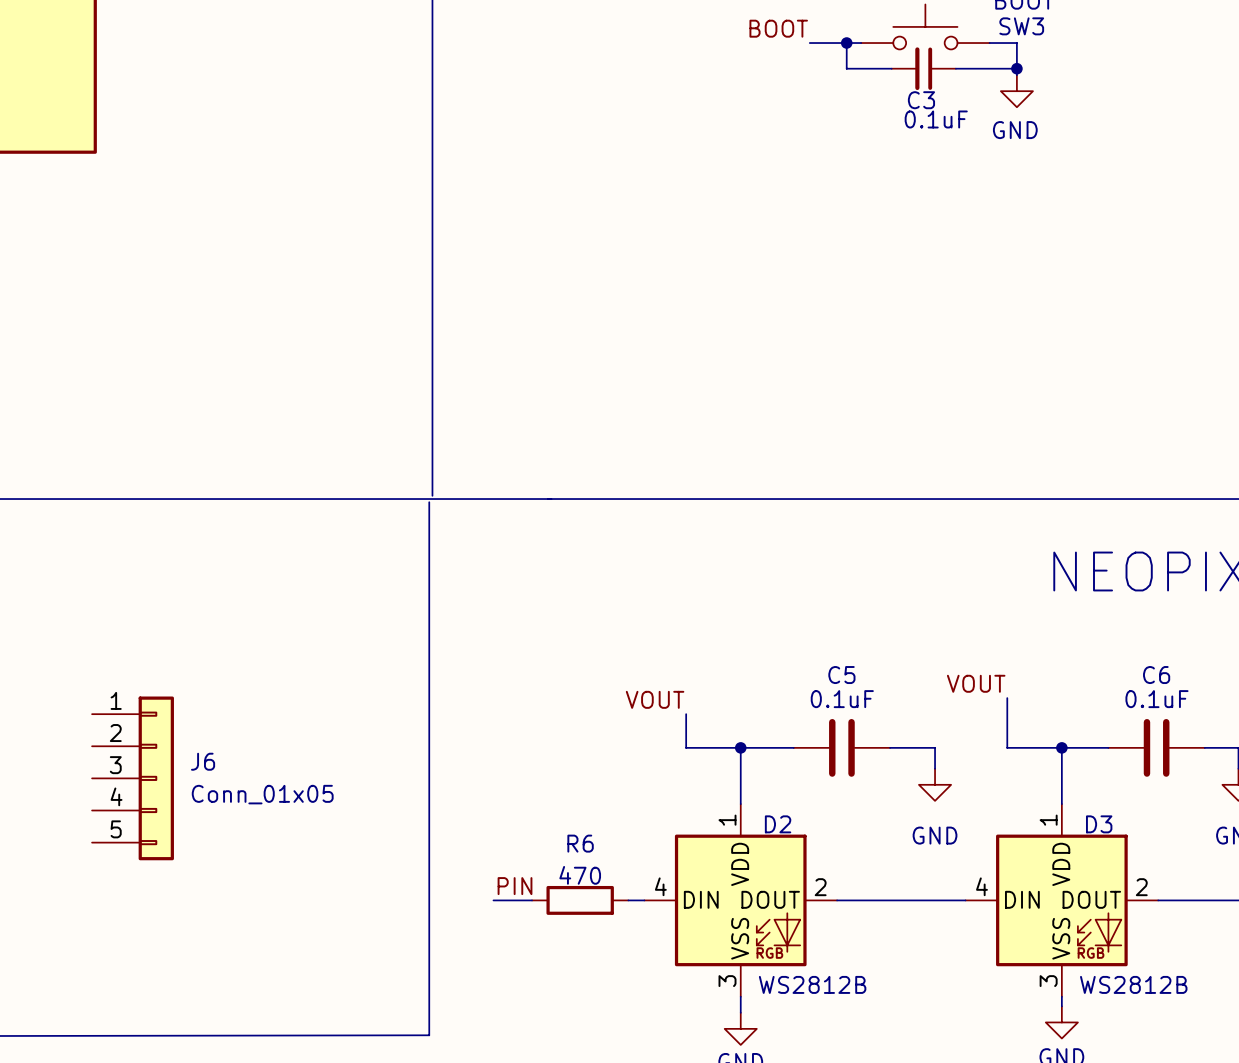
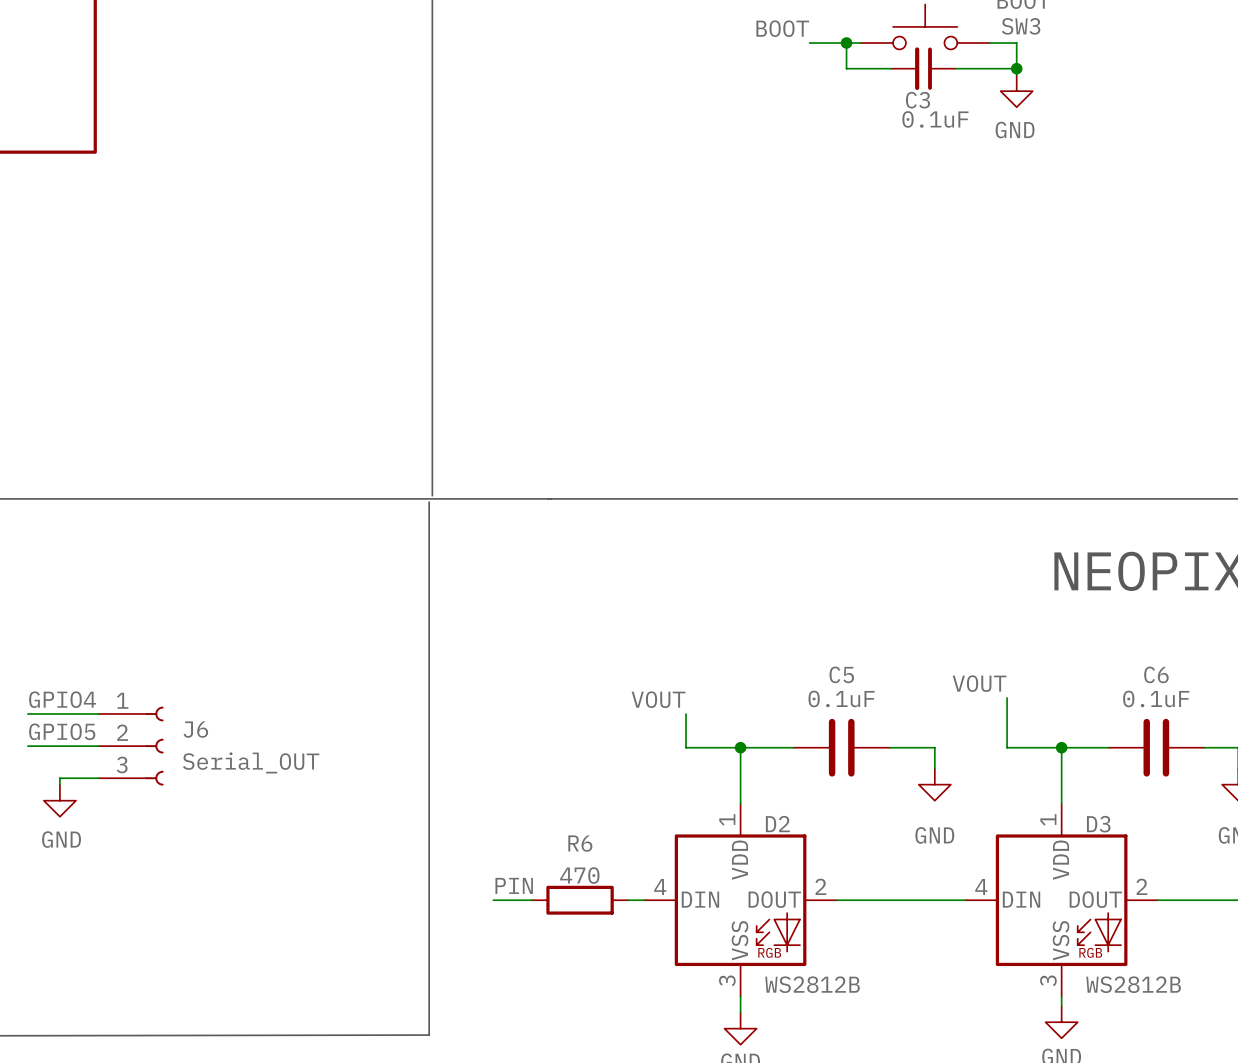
J6 symbol: [92, 696, 174, 861] -> [98, 706, 164, 786]
label: none -> GPIO4 (62, 699)
wire: none -> (27, 714) (98, 714)
label: none -> GPIO5 (62, 731)
wire: none -> (27, 746) (98, 746)
wire: none -> (98, 778) (59, 778) (59, 784)
J6 value: Conn_01x05 (262, 794) -> Serial_OUT (251, 762)
power symbol: none -> GND (59, 800)

